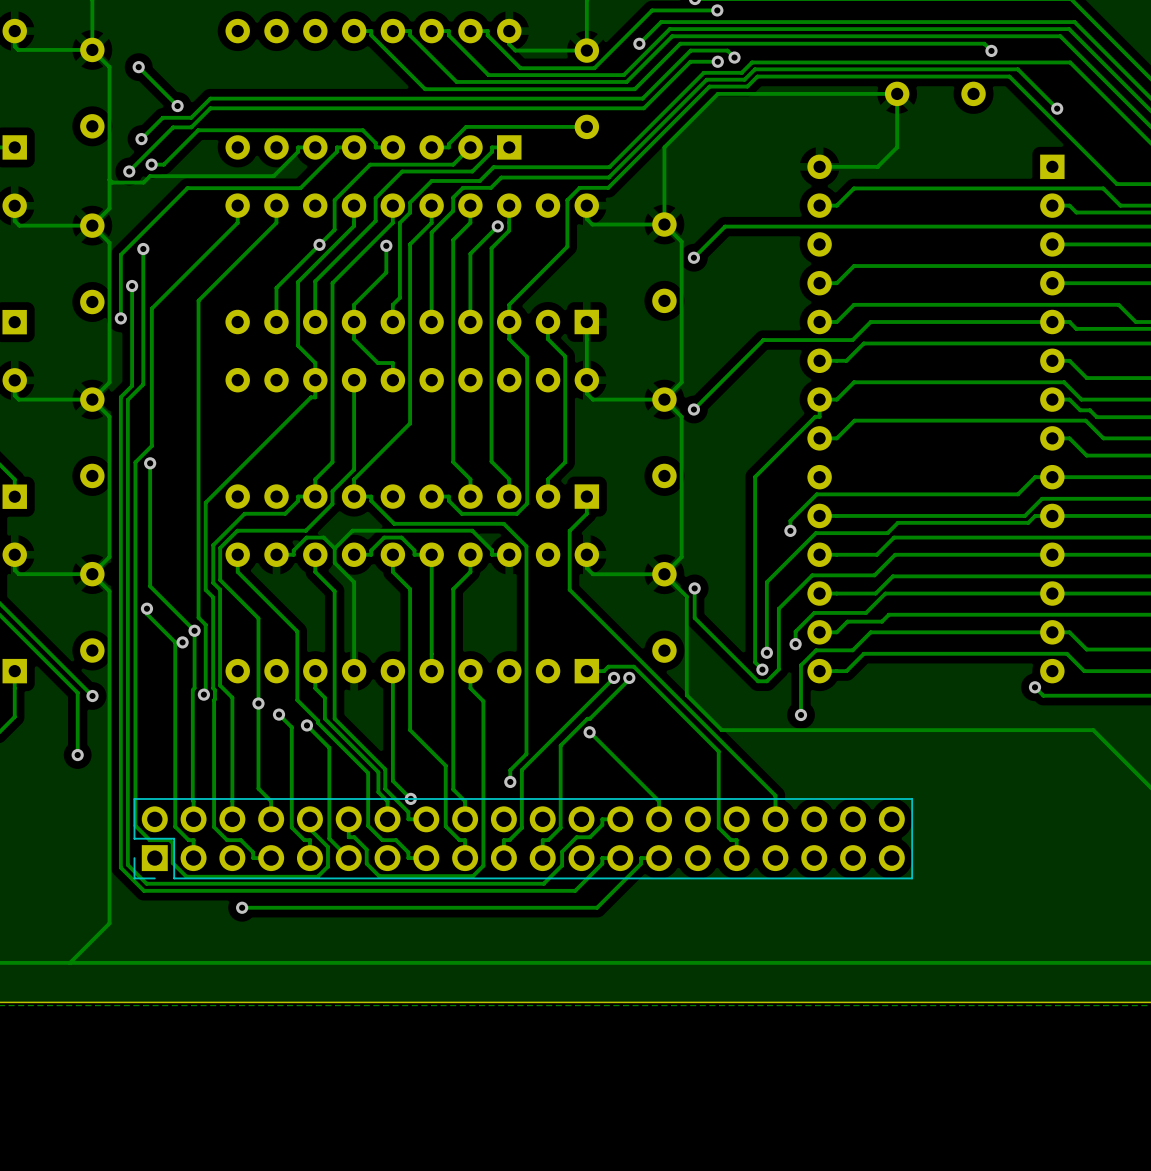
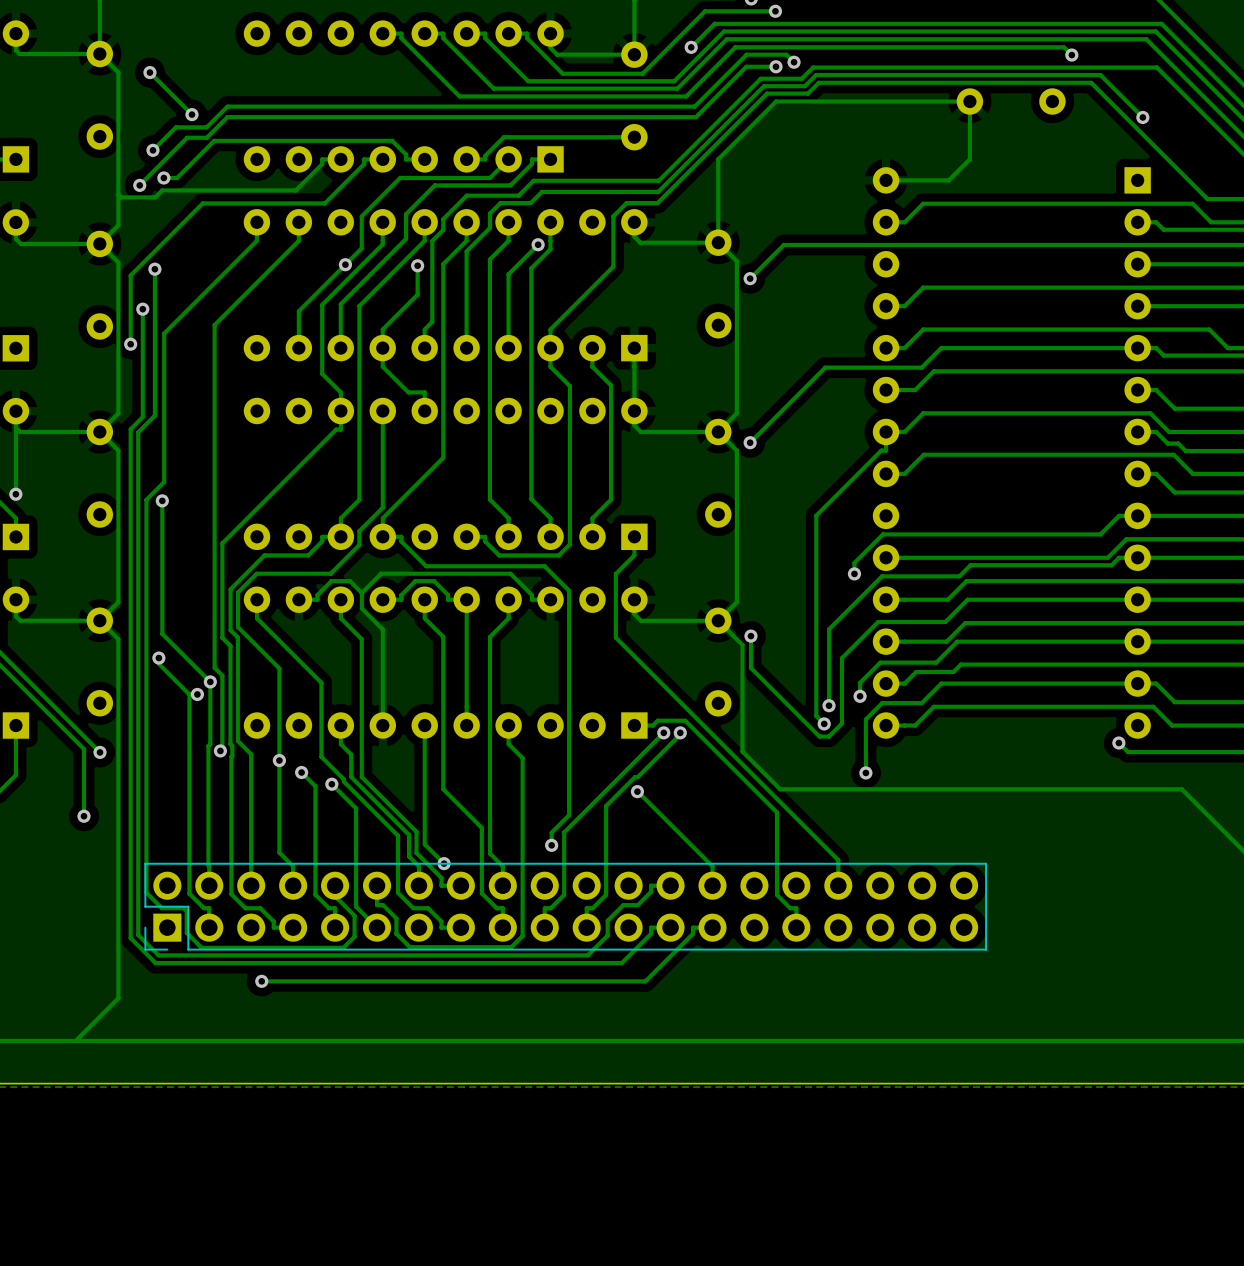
track: none -> (15, 427) (15, 494)
via: none -> (15, 494)

